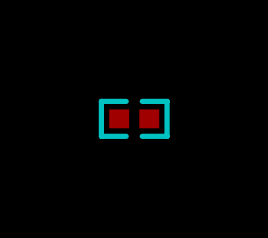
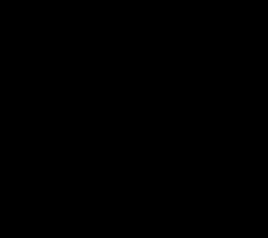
part: (134, 118) -> none

